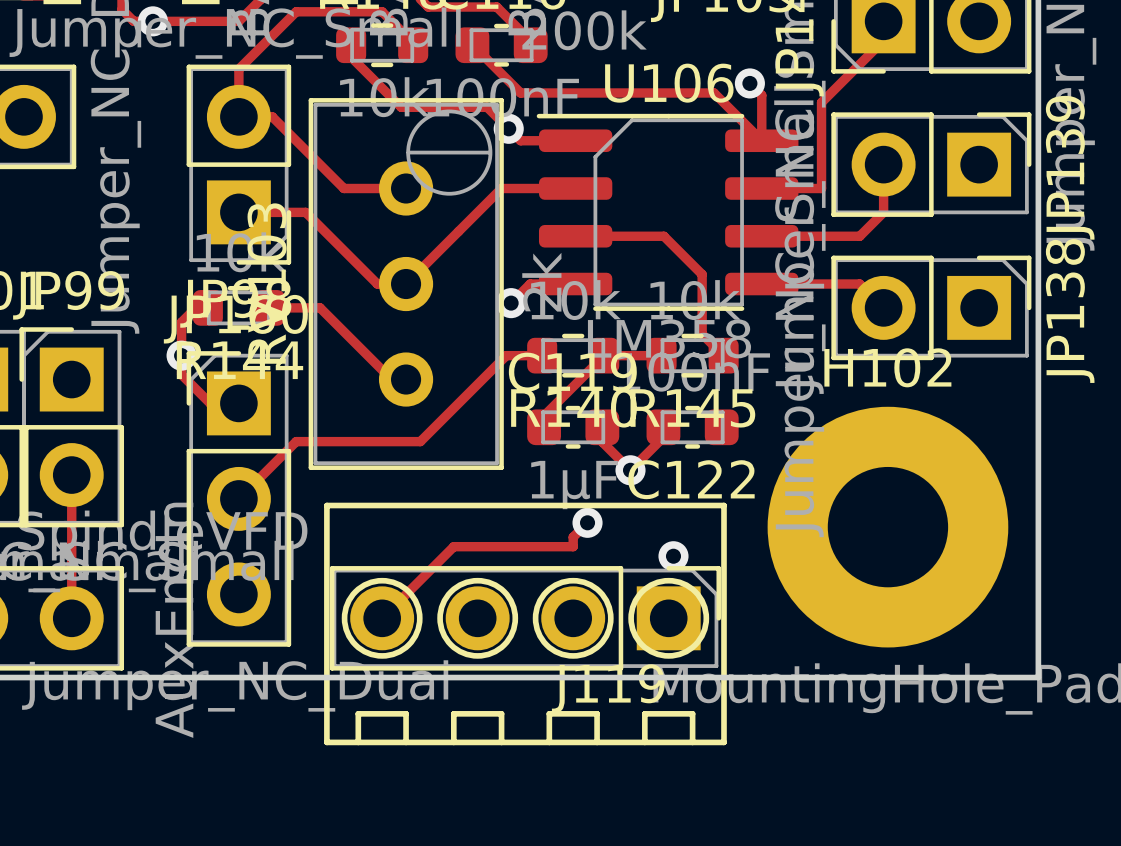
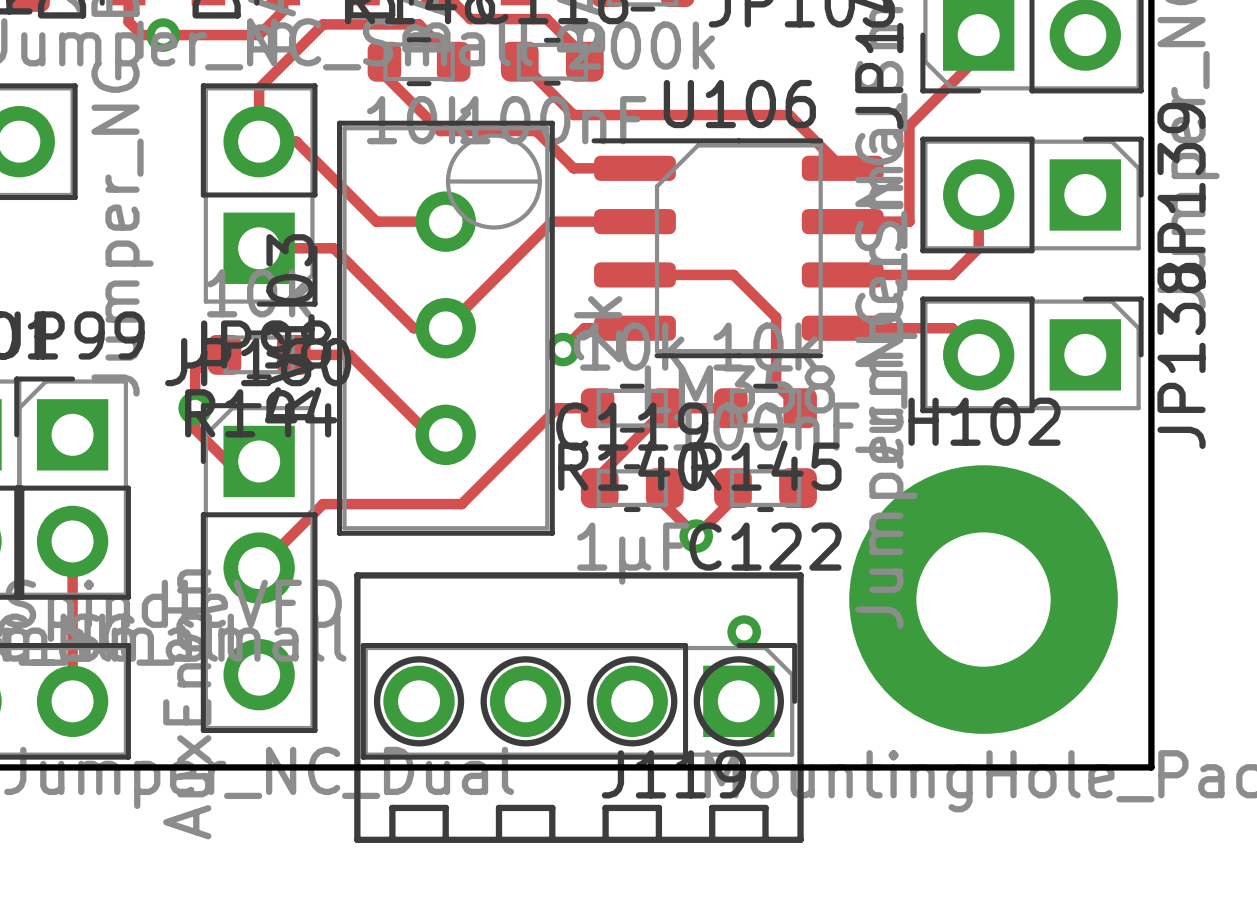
track: (749, 83) (761, 95) (761, 140) -> none
via: (749, 83) -> none
via: (508, 128) -> none
track: (587, 522) (573, 537) (573, 546) (453, 546) (382, 618) -> none
via: (587, 522) -> none

